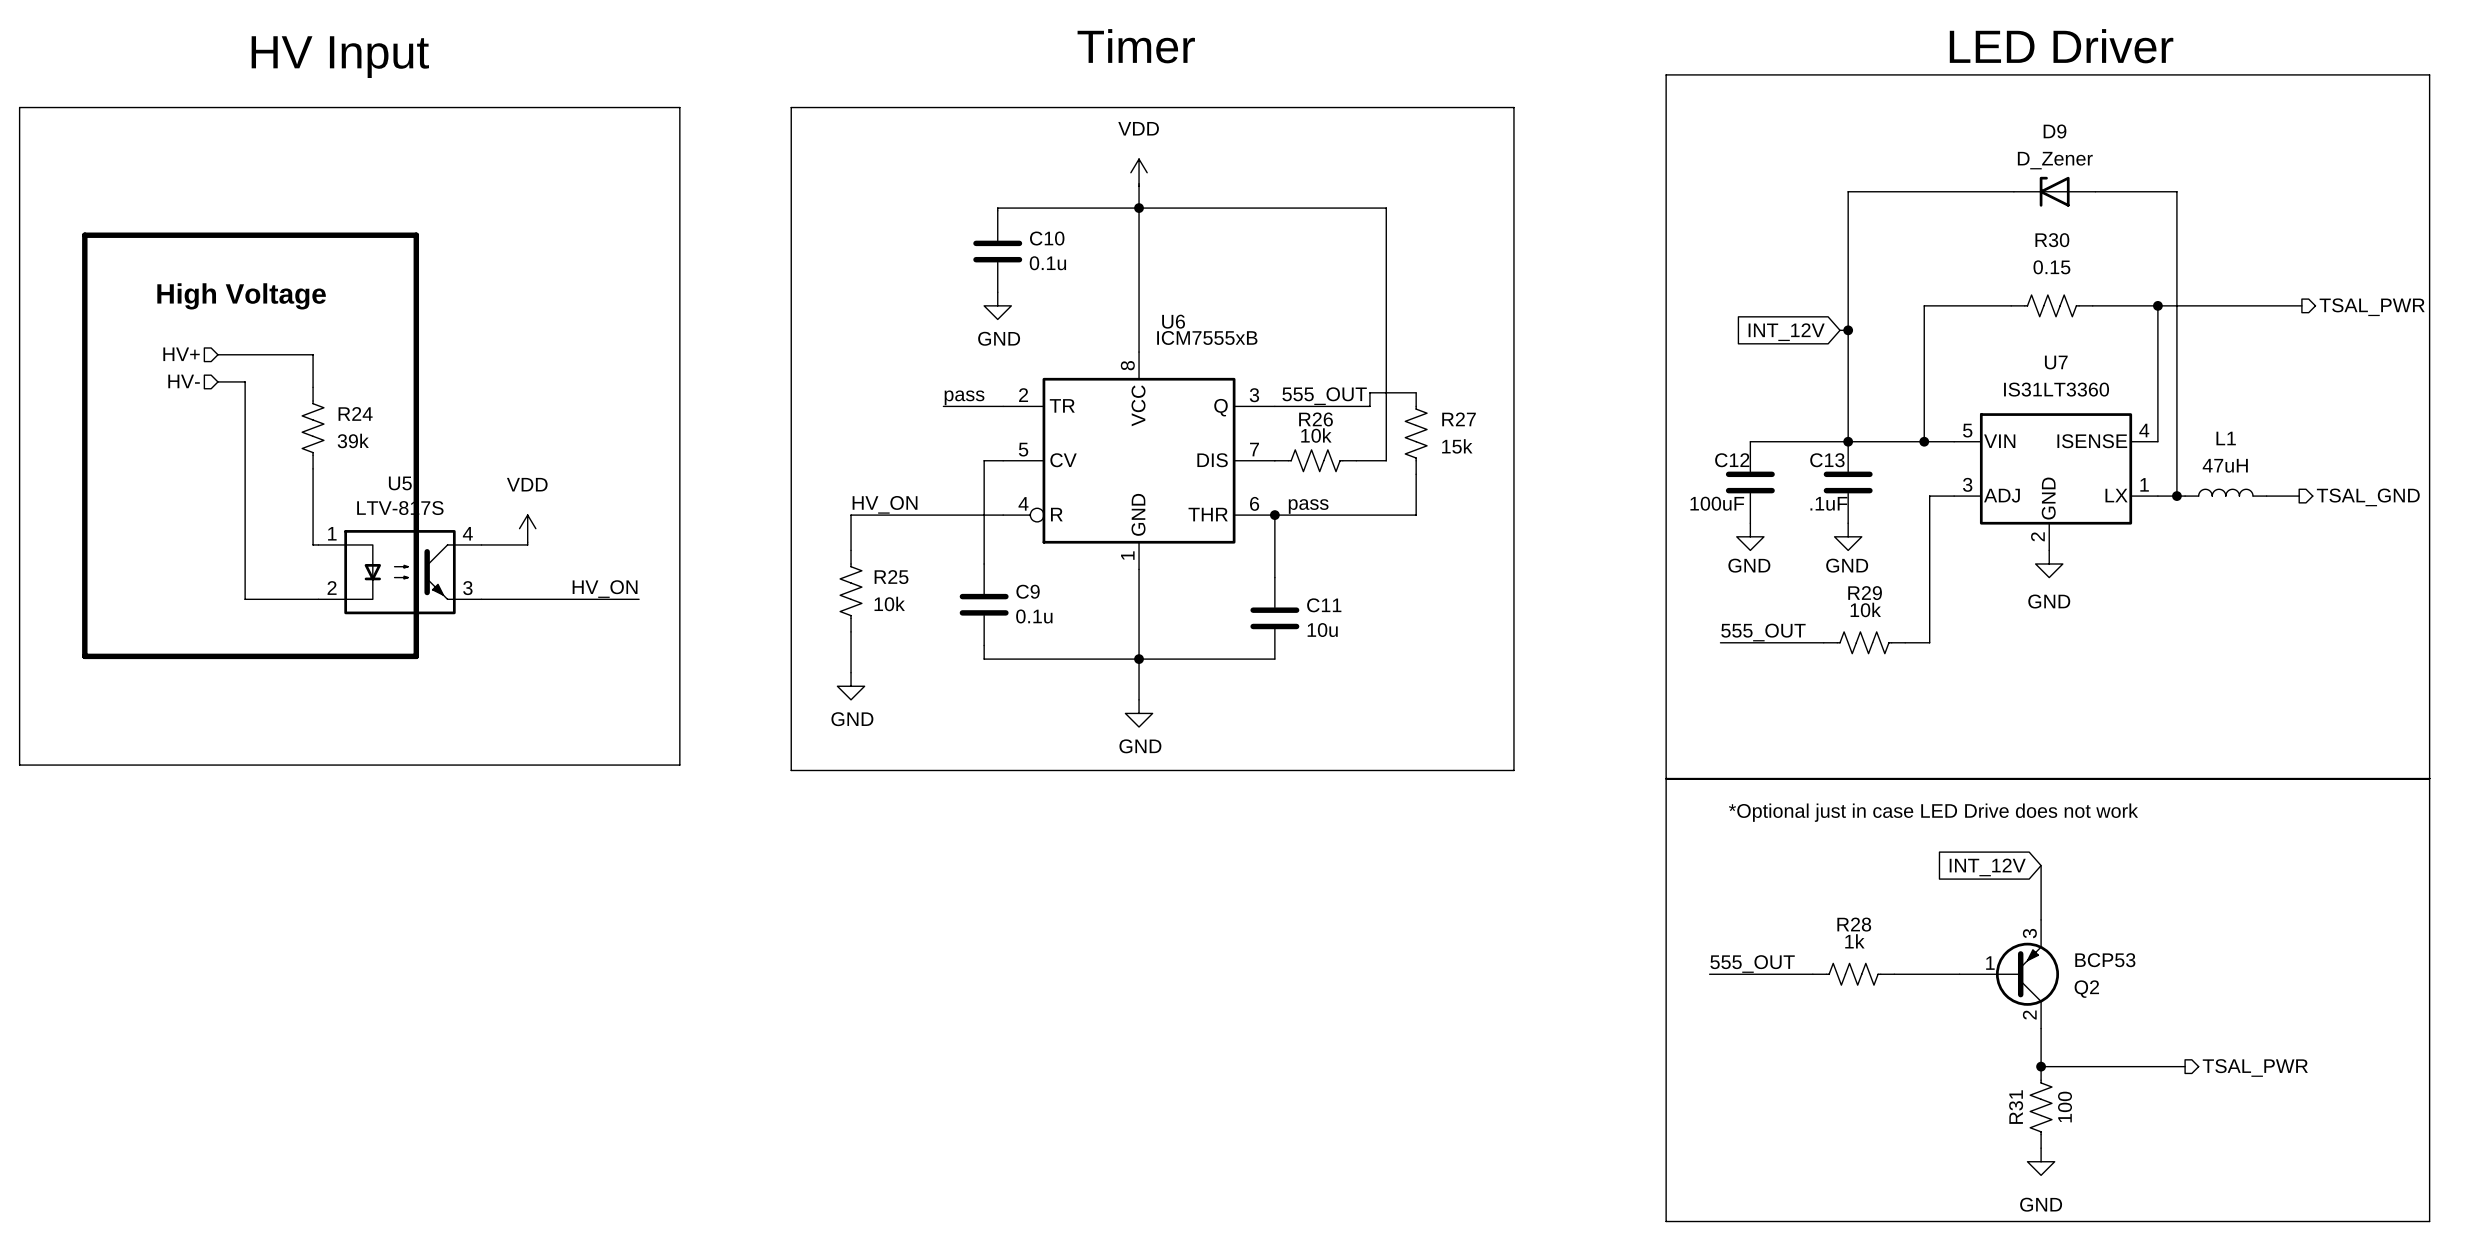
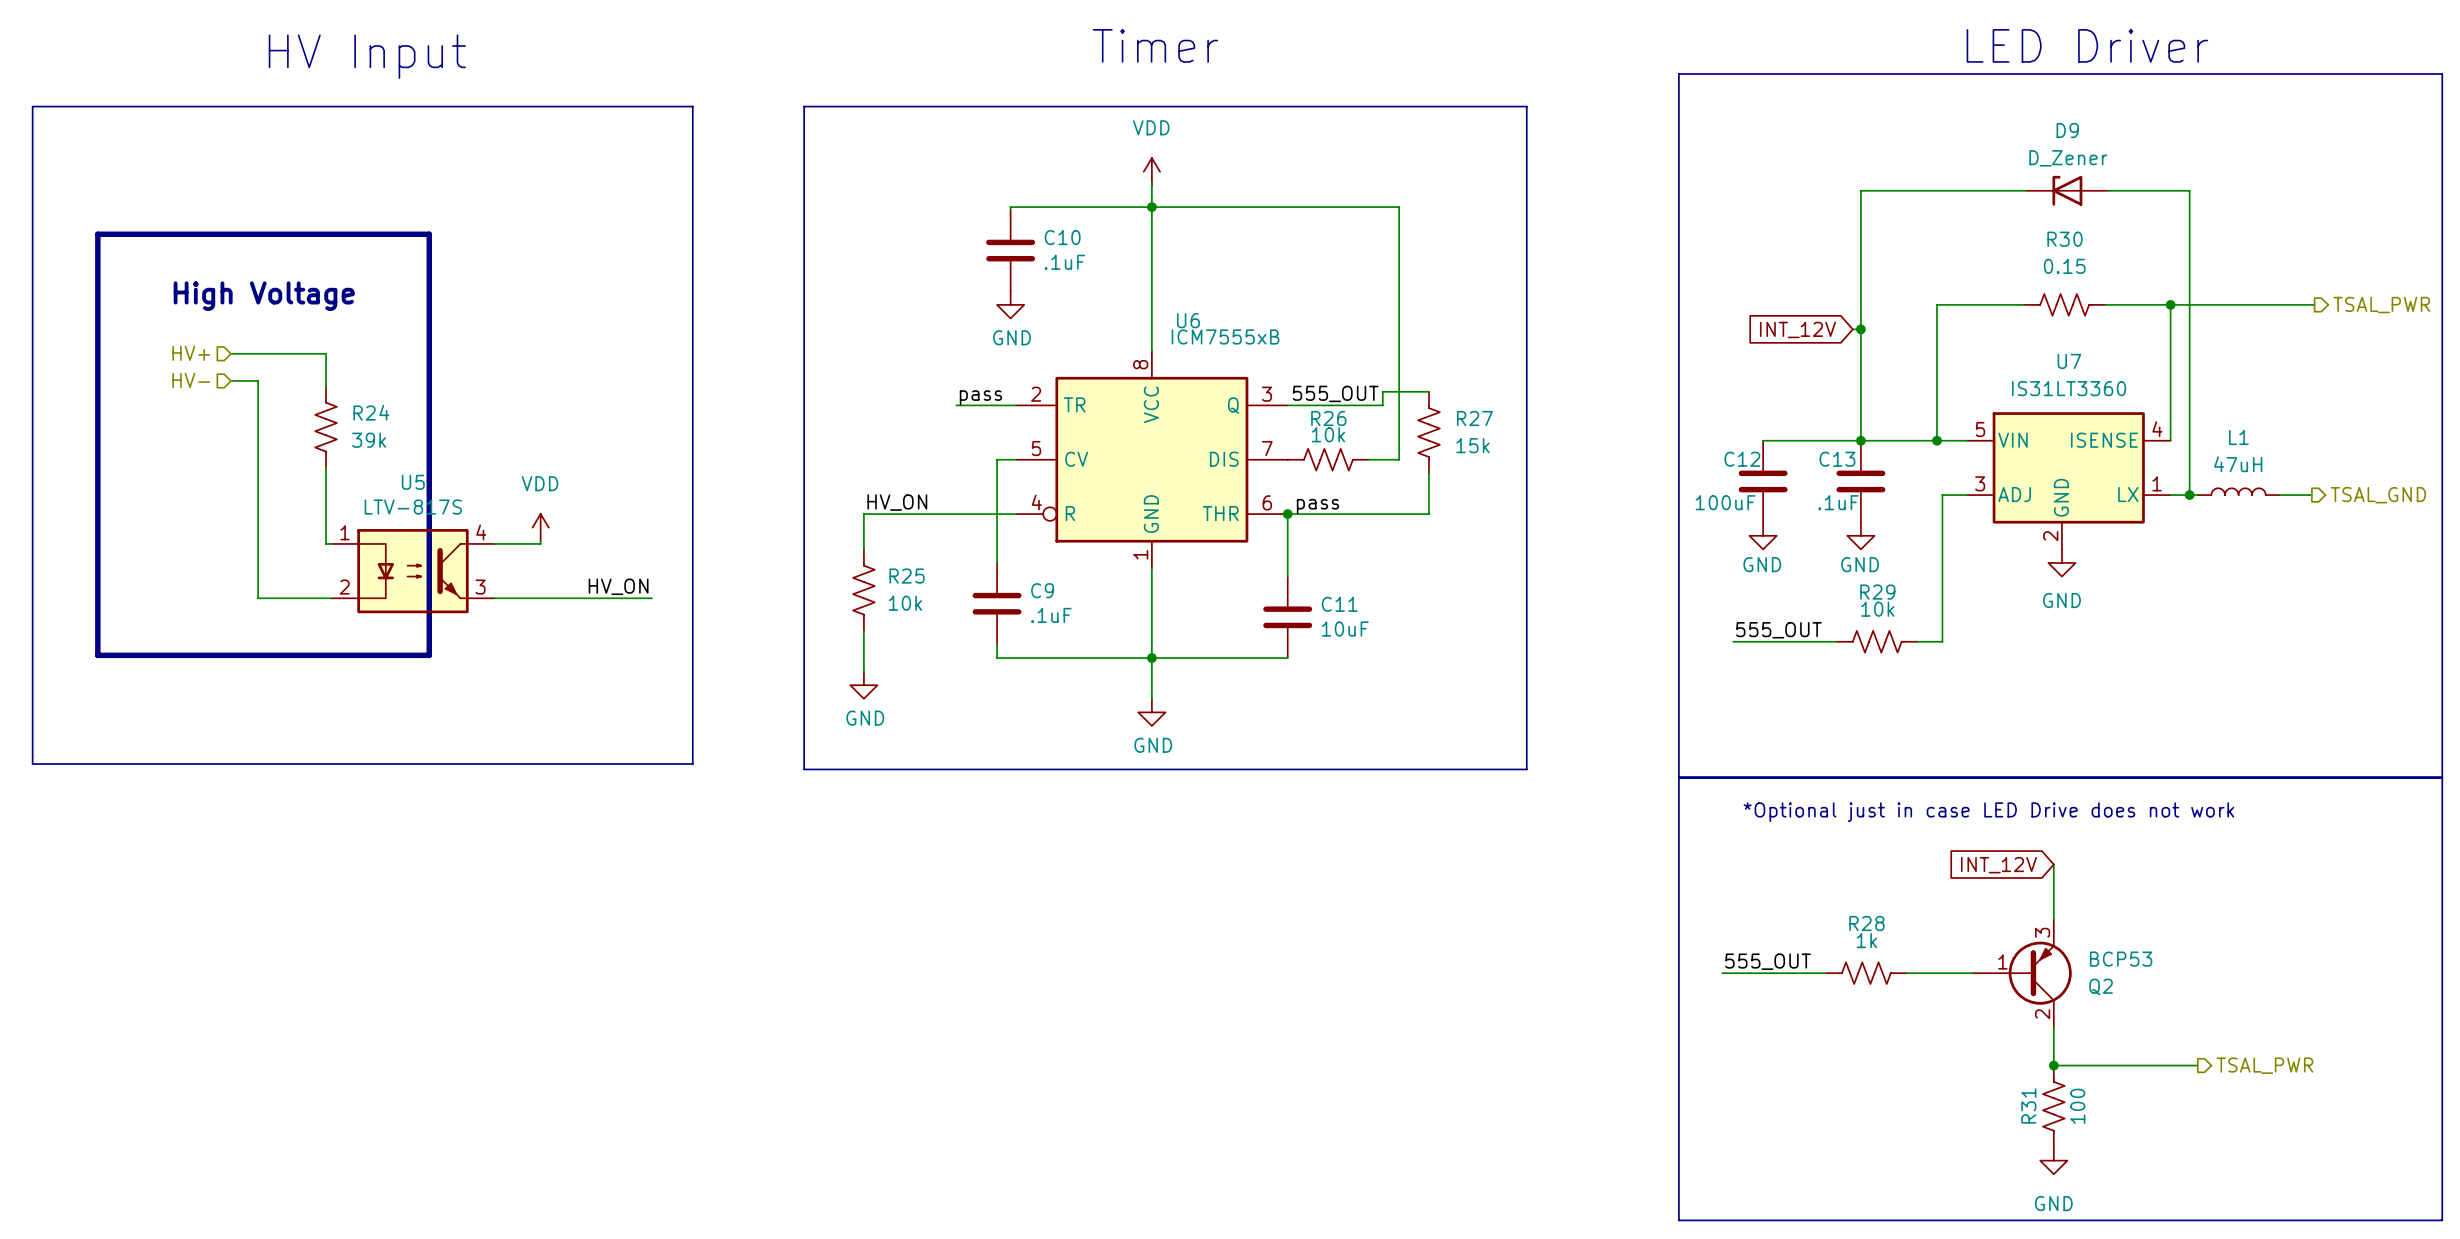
C10 value: 0.1u (1047, 263) -> .1uF (1064, 262)
C9 value: 0.1u (1034, 616) -> .1uF (1051, 615)
C11 value: 10u (1322, 630) -> 10uF (1345, 629)

